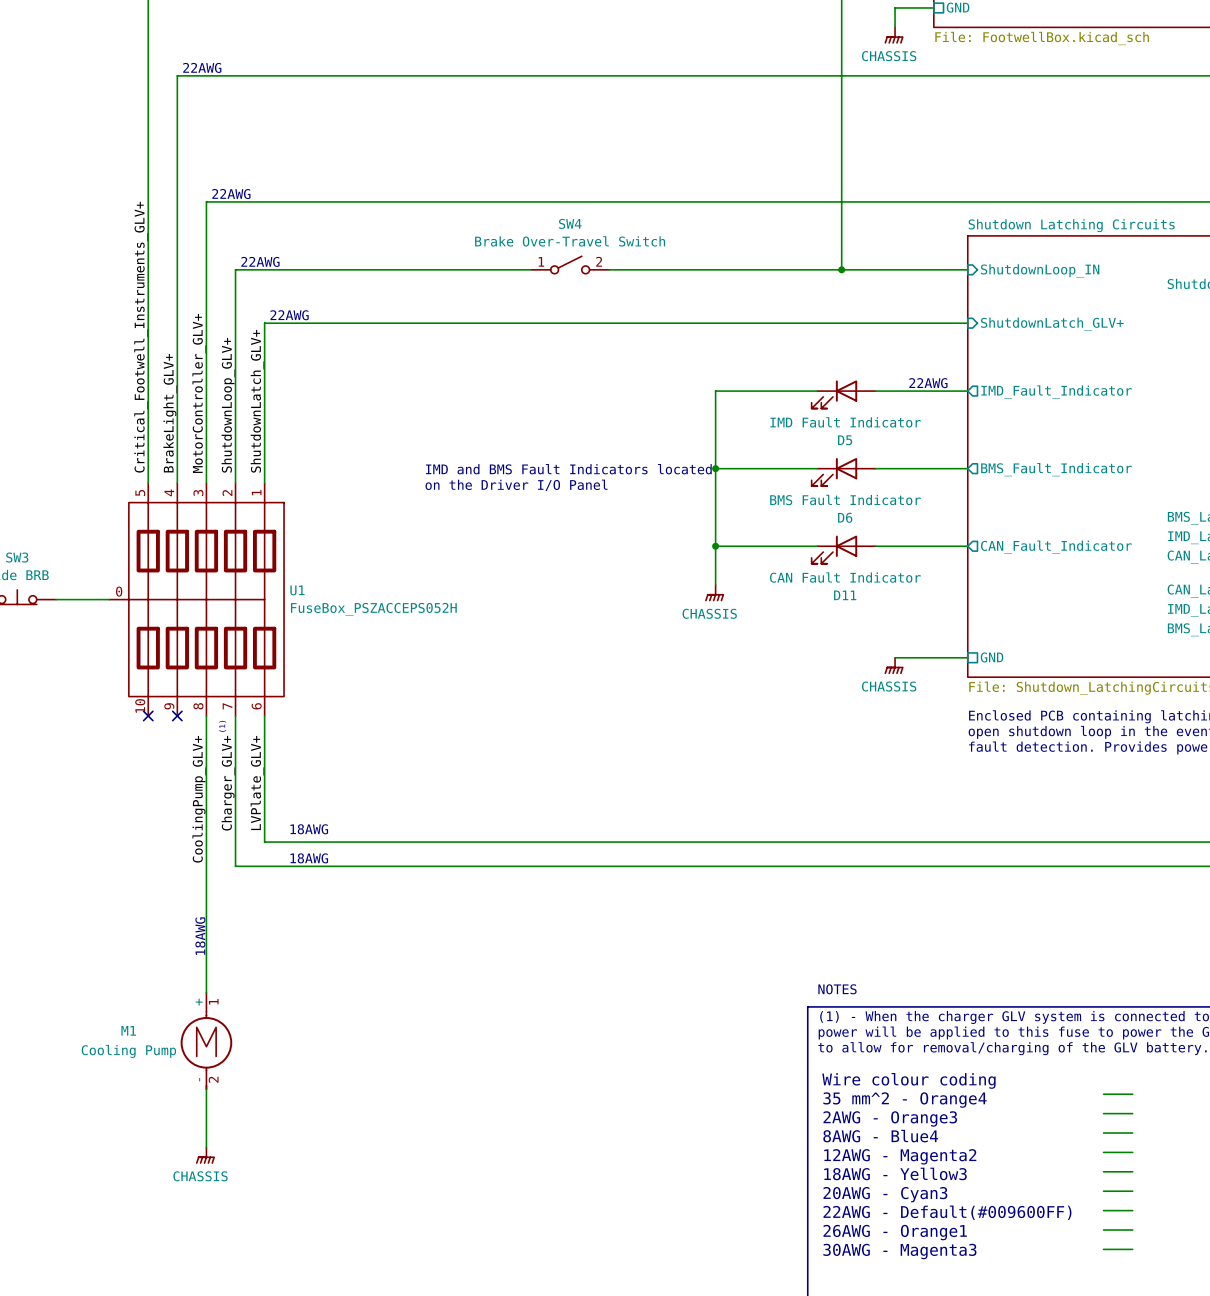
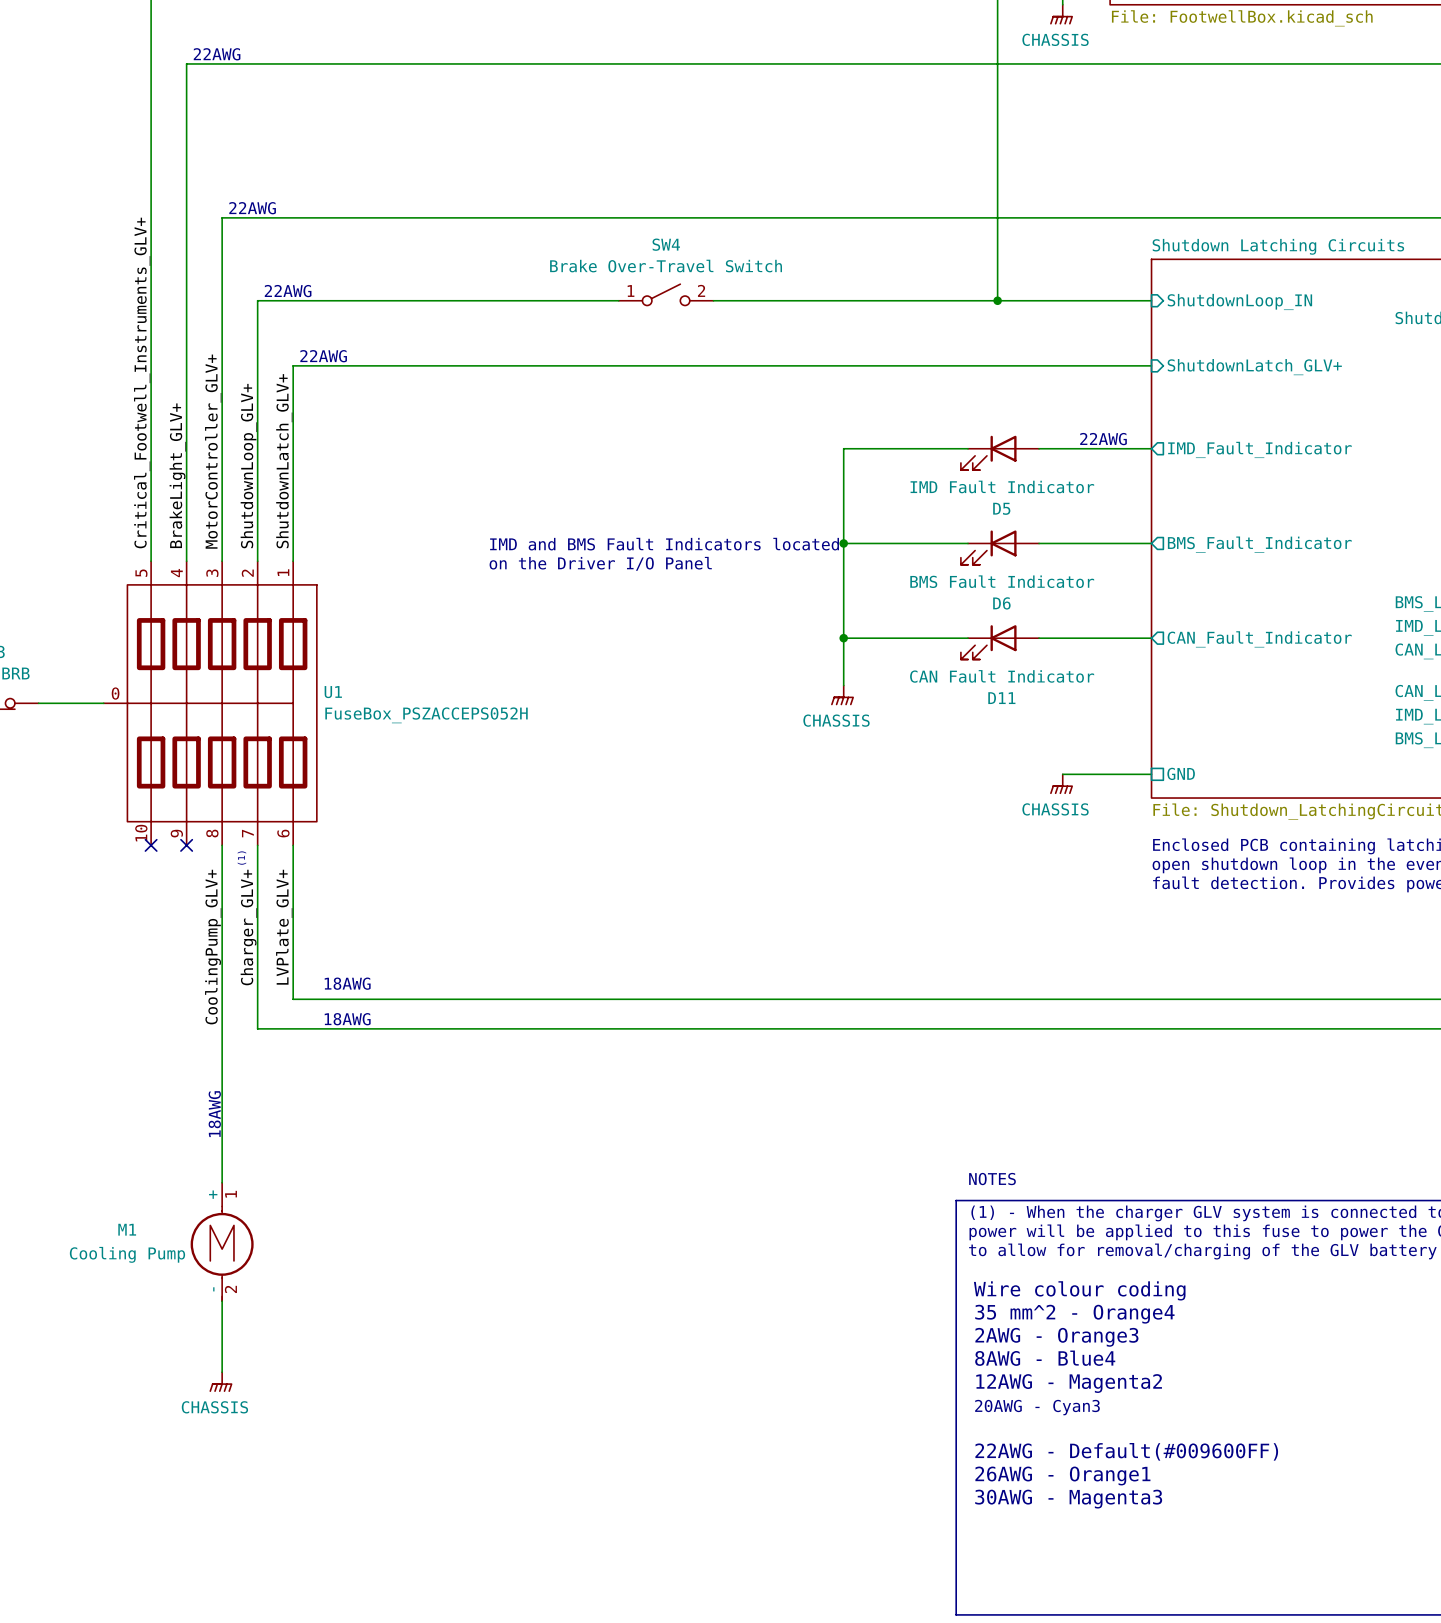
wire: (1103, 1094) (1132, 1094) -> none
wire: (1103, 1113) (1132, 1113) -> none
wire: (1103, 1133) (1132, 1133) -> none
wire: (1103, 1152) (1132, 1152) -> none
wire: (1103, 1171) (1132, 1171) -> none
text: 18AWG - Yellow3 (895, 1173) -> 20AWG - Cyan3 (1037, 1407)
wire: (1103, 1191) (1132, 1191) -> none
text: 20AWG - Cyan3 (885, 1194) -> none
wire: (1103, 1210) (1132, 1210) -> none
wire: (1103, 1230) (1132, 1230) -> none
wire: (1103, 1249) (1132, 1249) -> none

